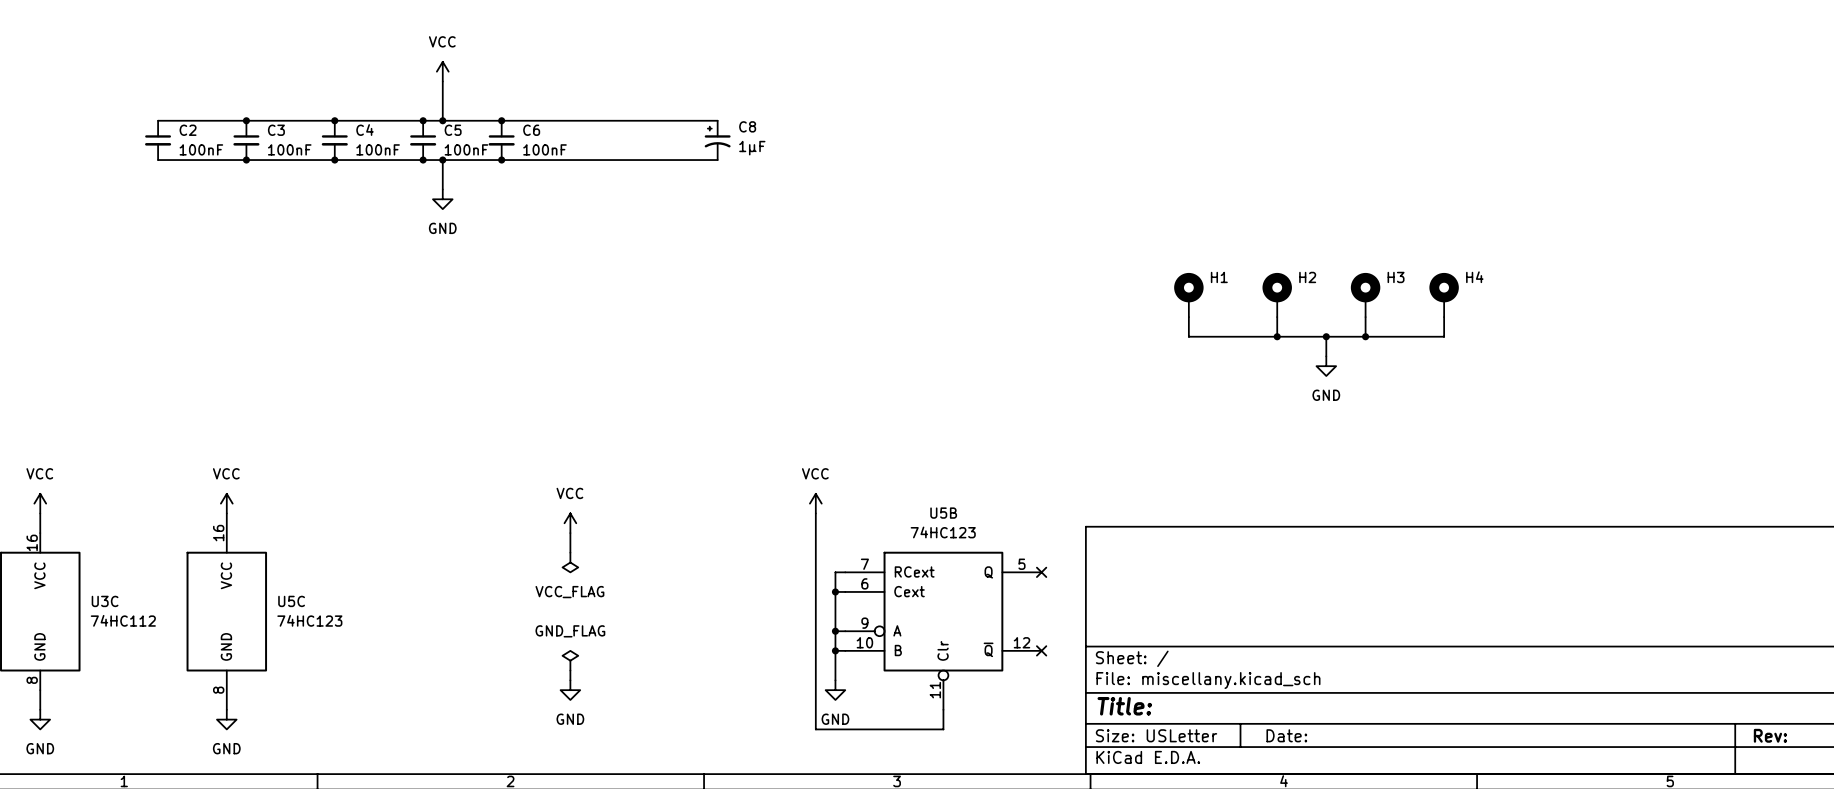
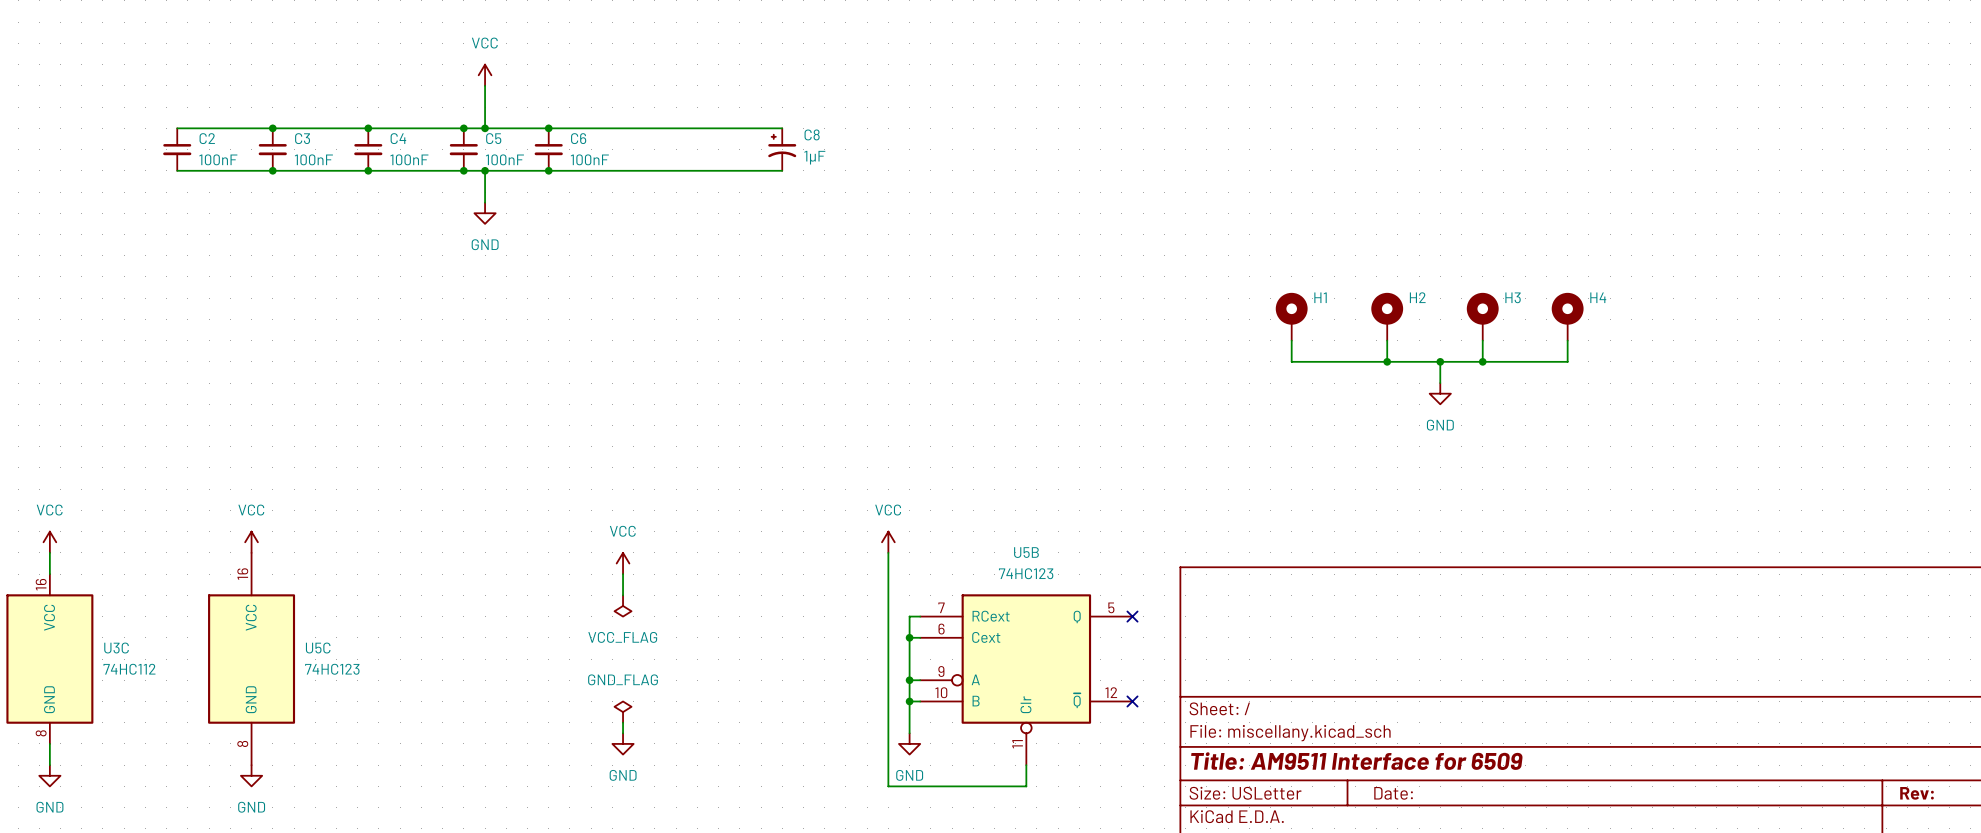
title block: Title: (1124, 706) -> Title: AM9511 Interface for 6509 (1356, 761)

